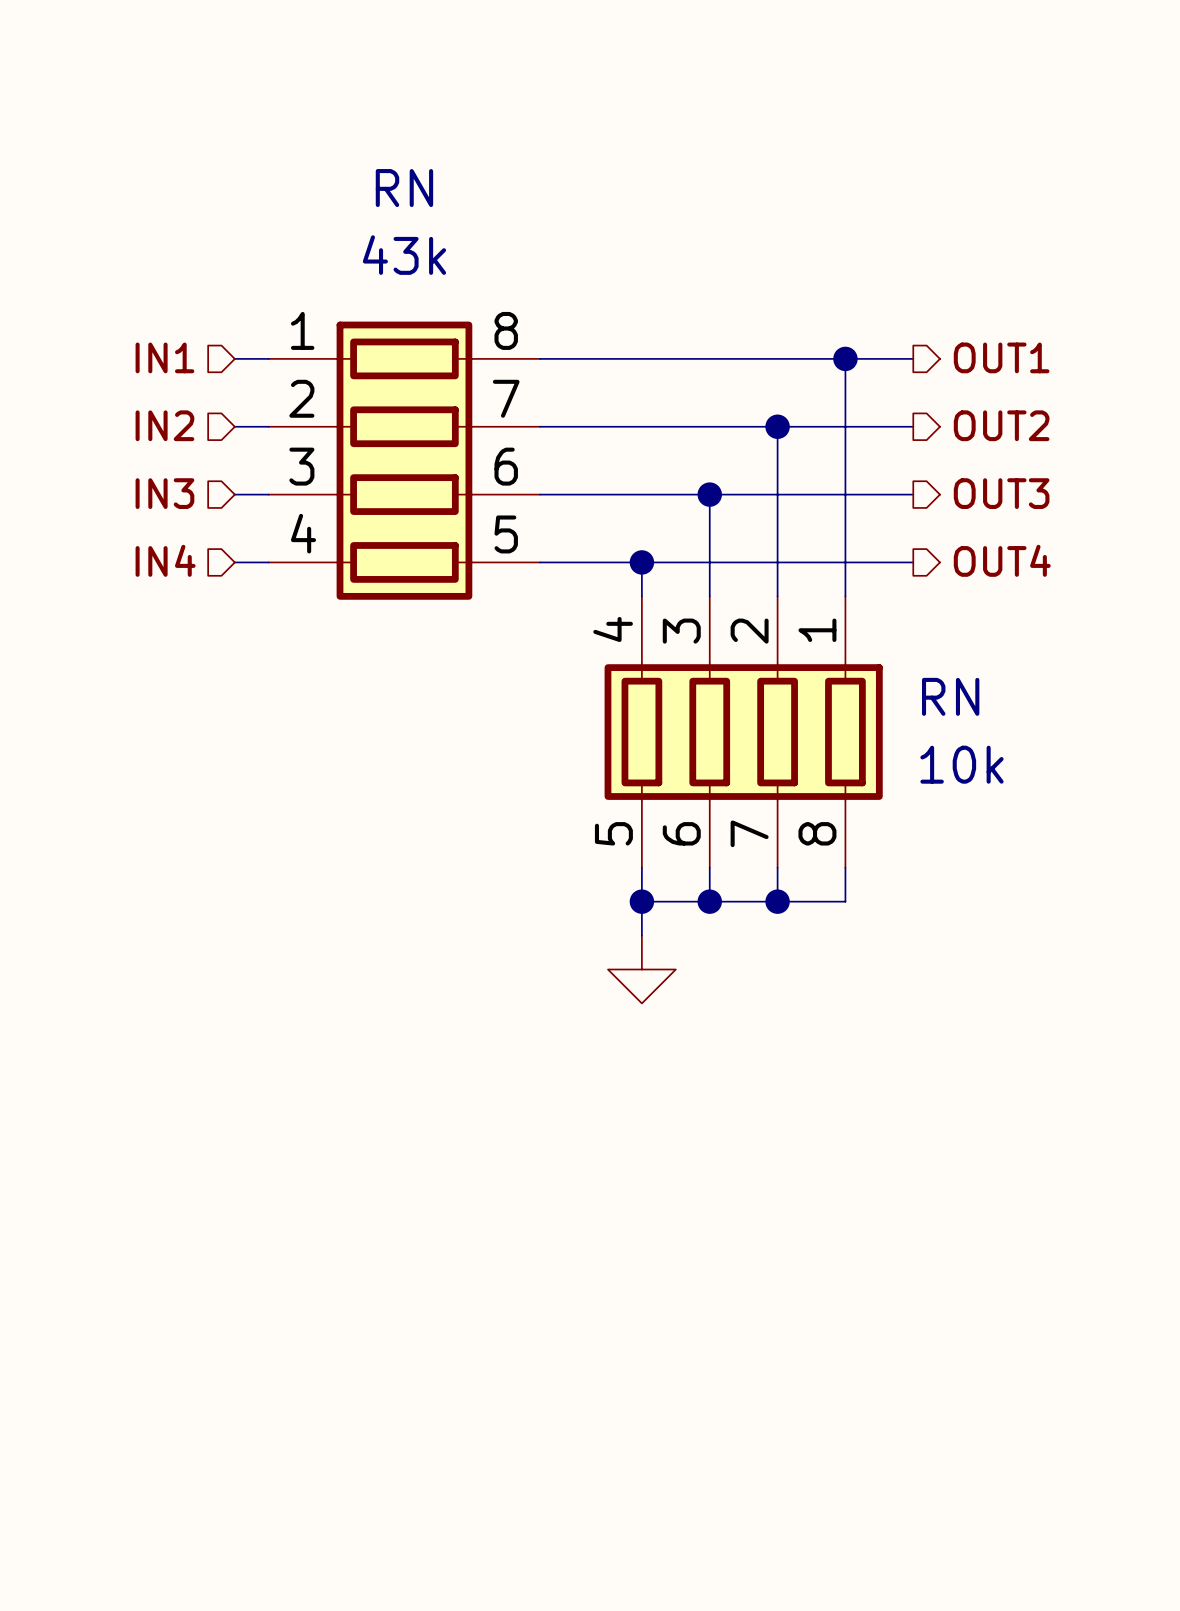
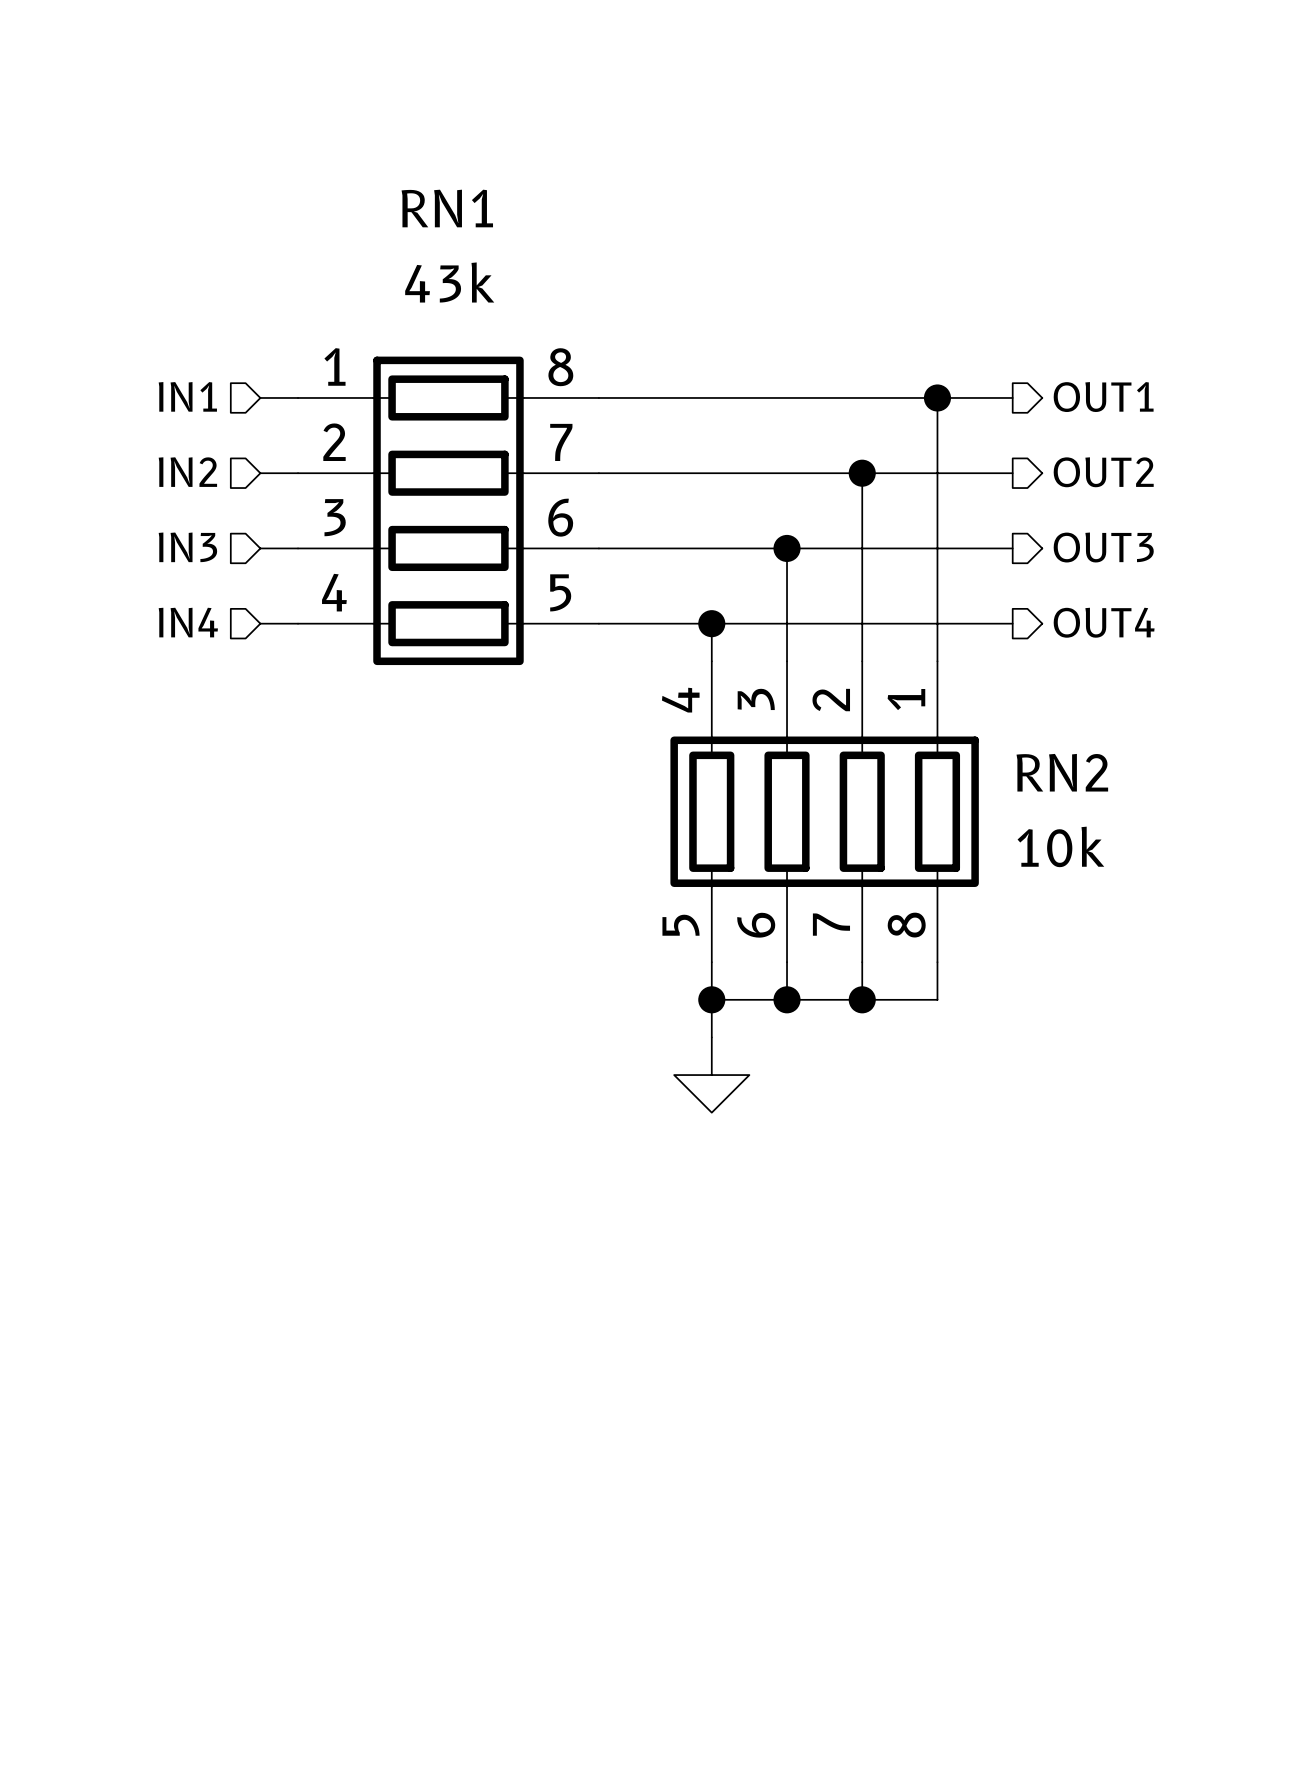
RN name: RN (404, 188) -> RN1 (447, 208)
RN name: RN (950, 696) -> RN2 (1062, 772)

